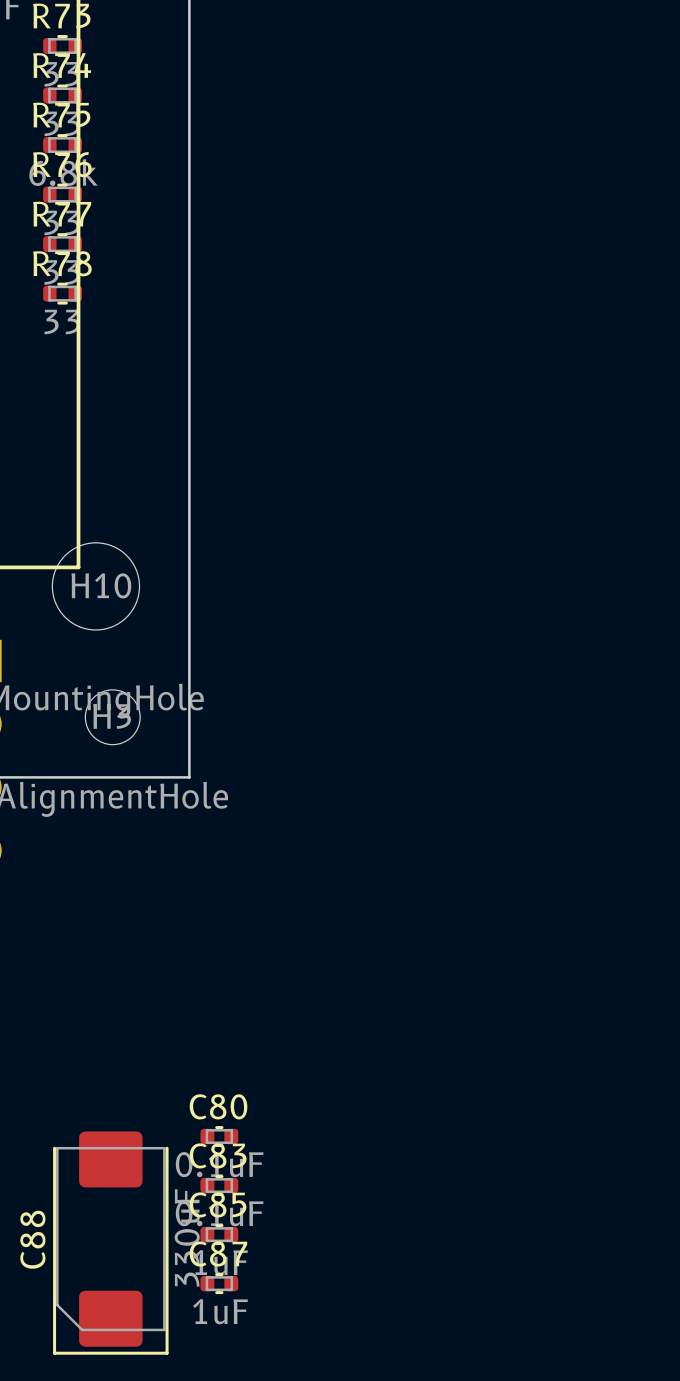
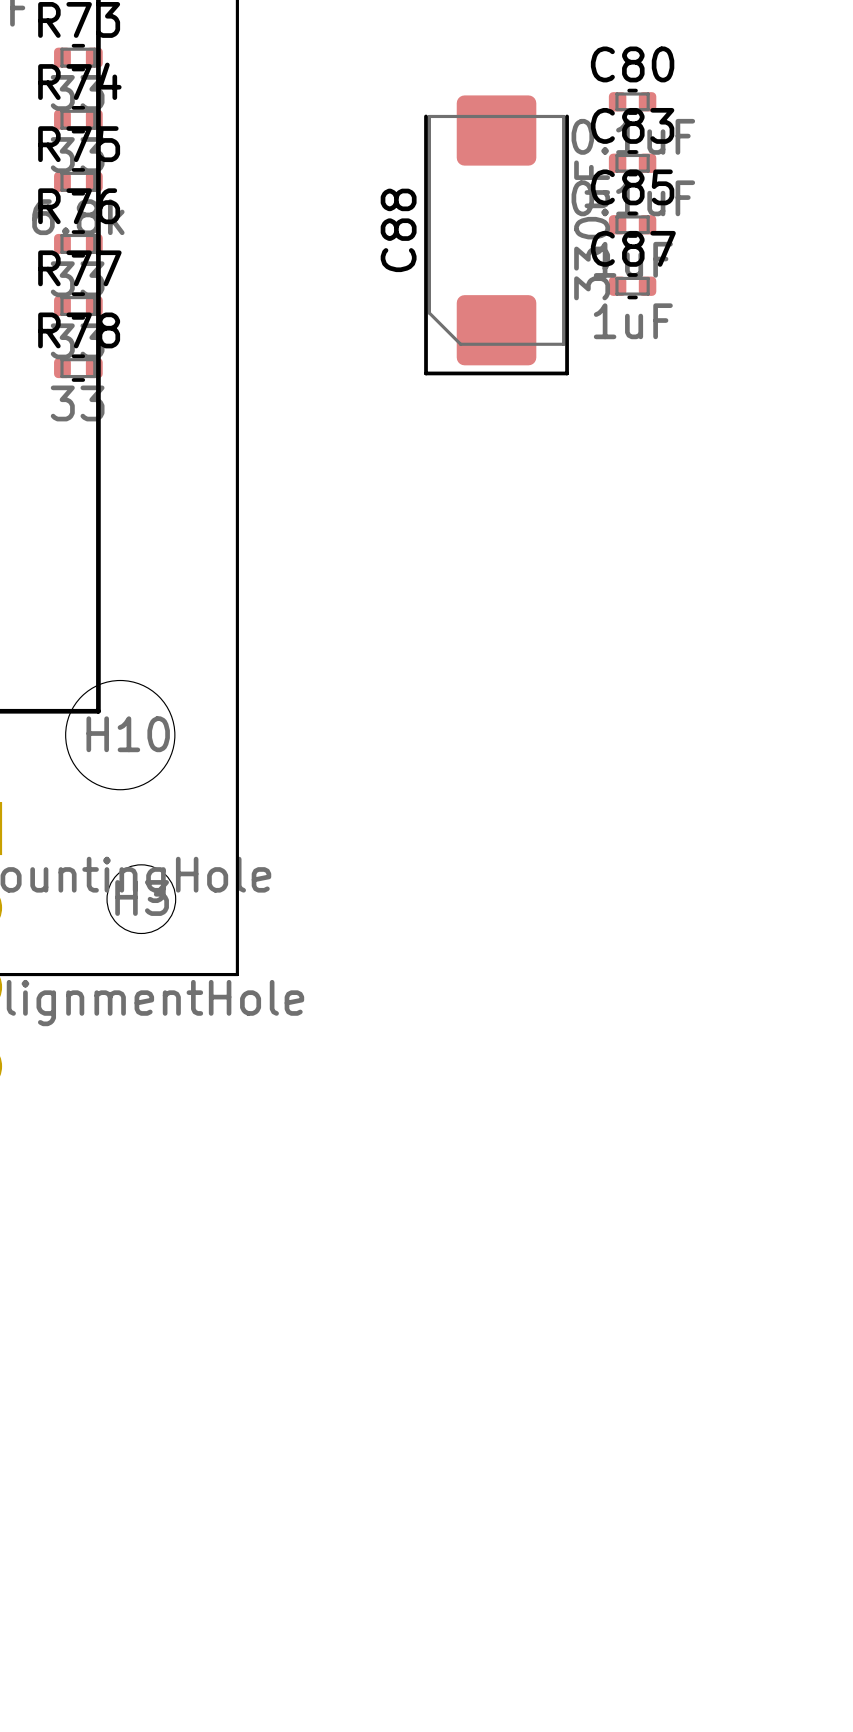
C80 position: (219, 1136) -> (632, 101)
C83 position: (219, 1185) -> (632, 163)
C85 position: (219, 1234) -> (632, 224)
C88 position: (110, 1243) -> (496, 235)
C87 position: (219, 1283) -> (632, 286)

